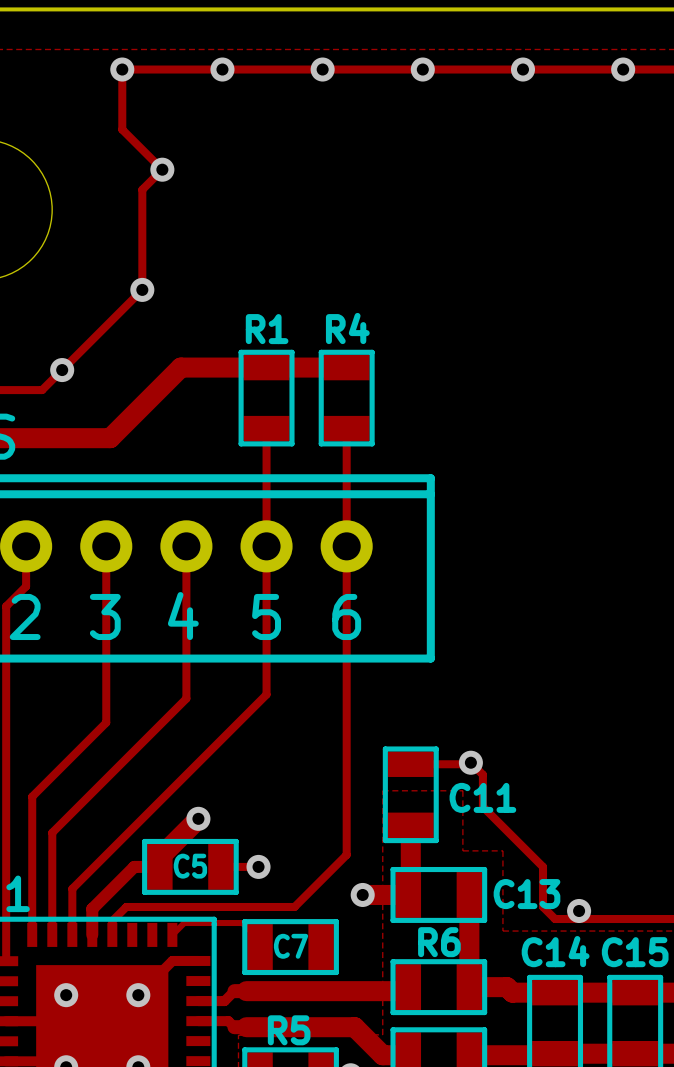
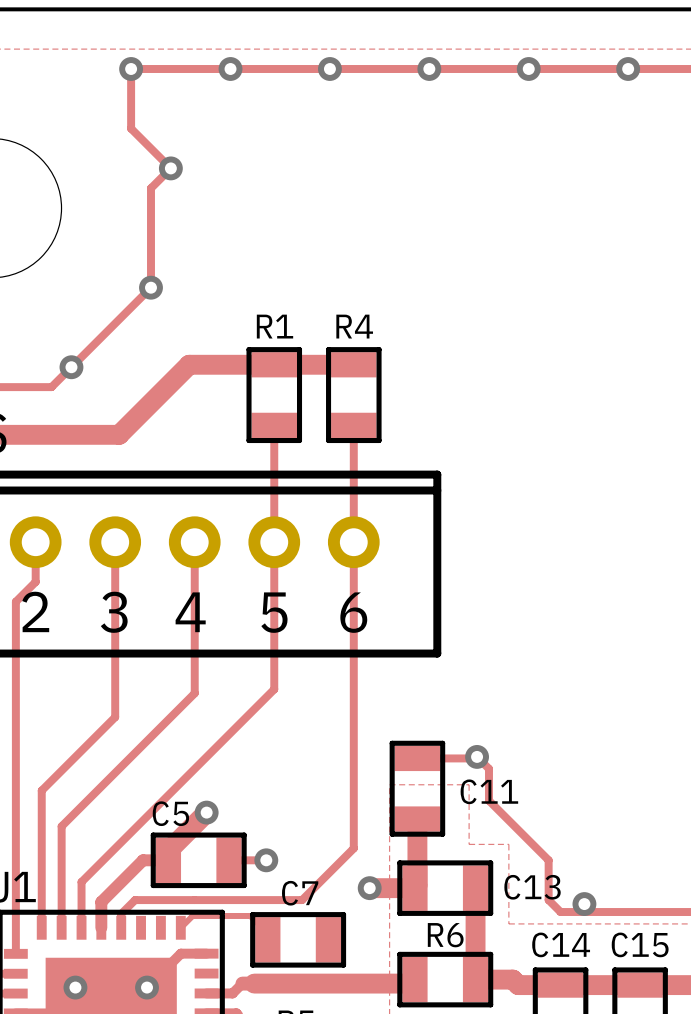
C5 name position: C5 (190, 866) -> C5 (170, 813)
C7 name position: C7 (291, 946) -> C7 (300, 893)

